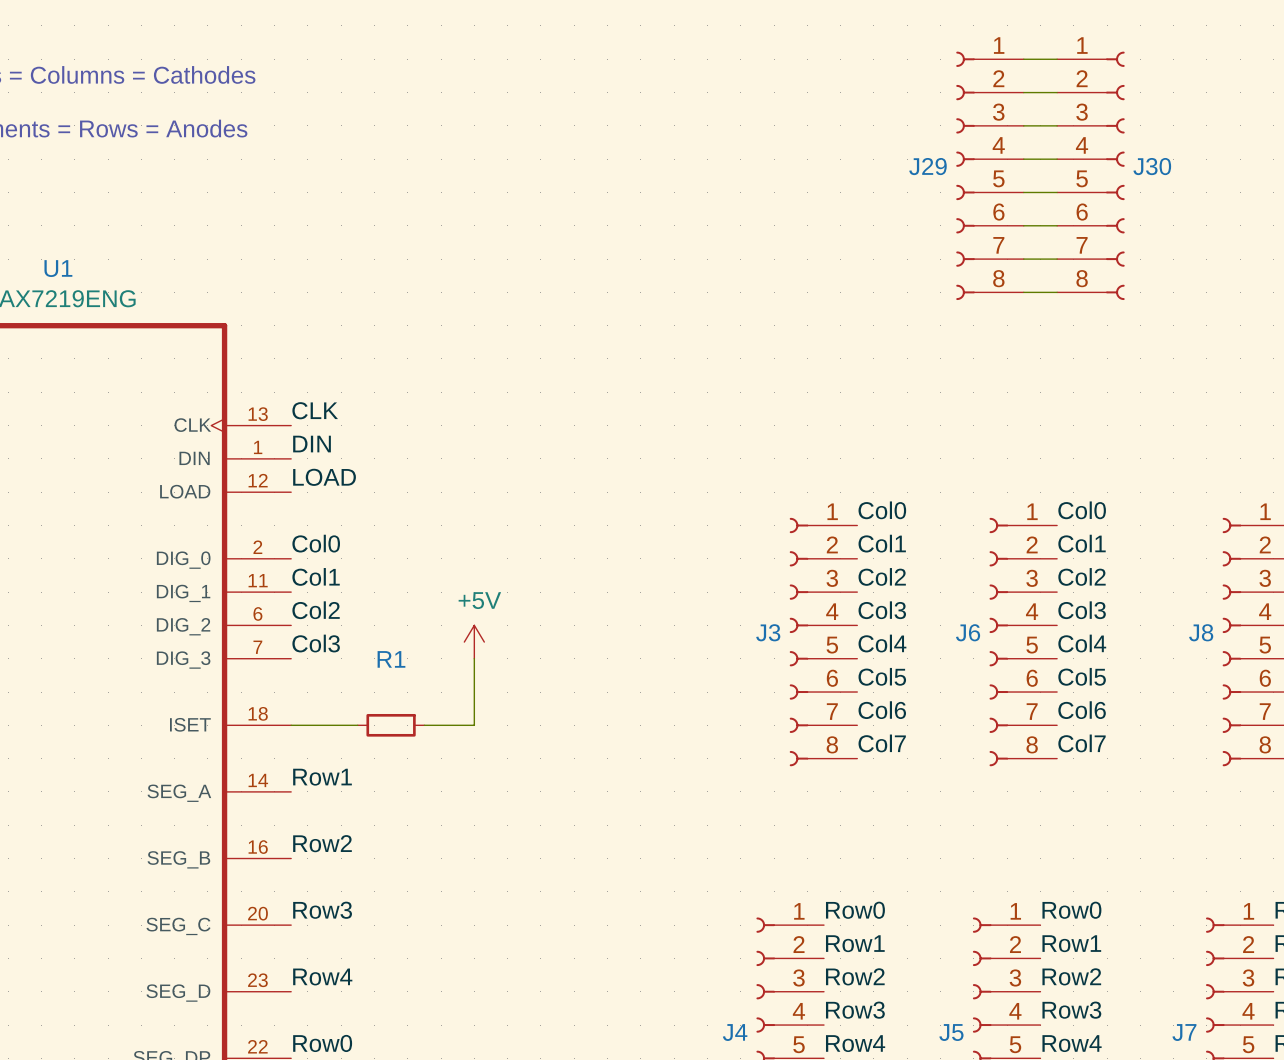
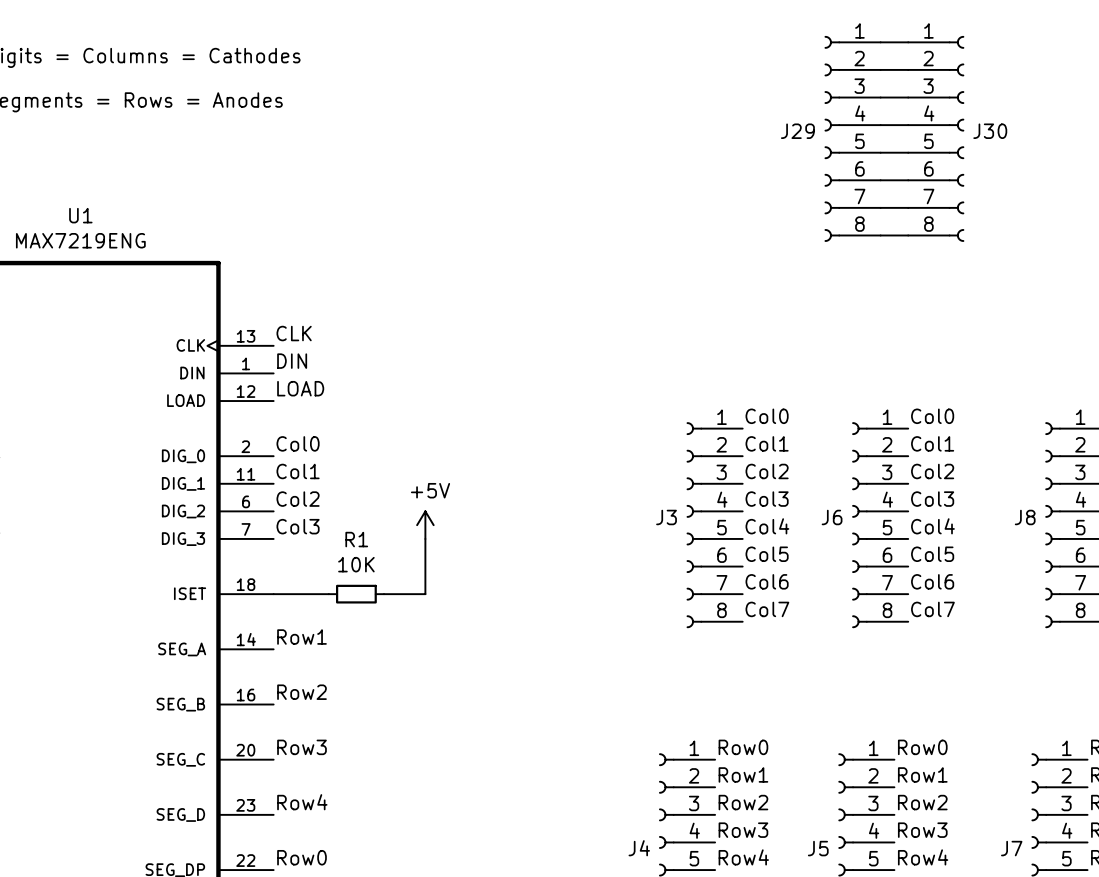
R1 value: none -> 10K (356, 564)

